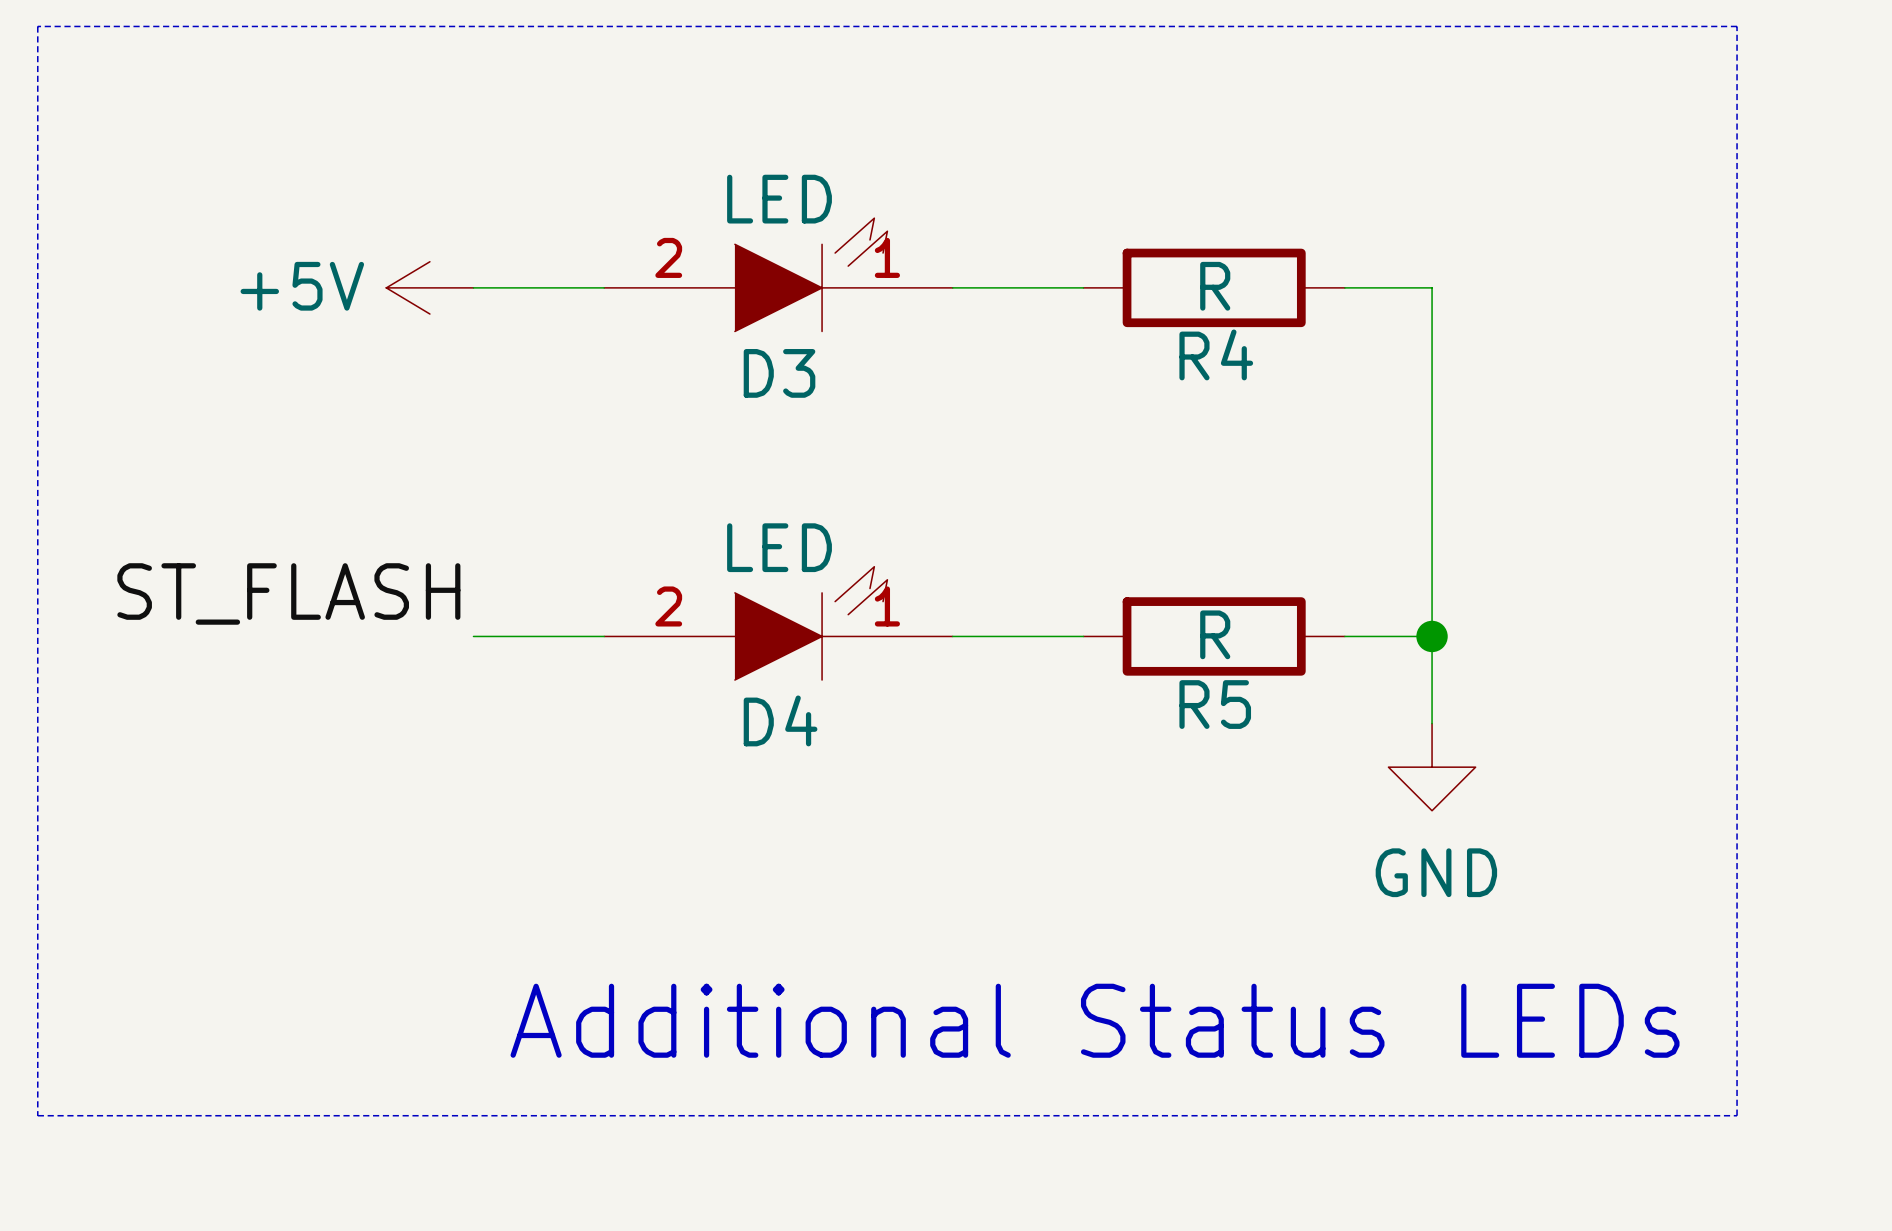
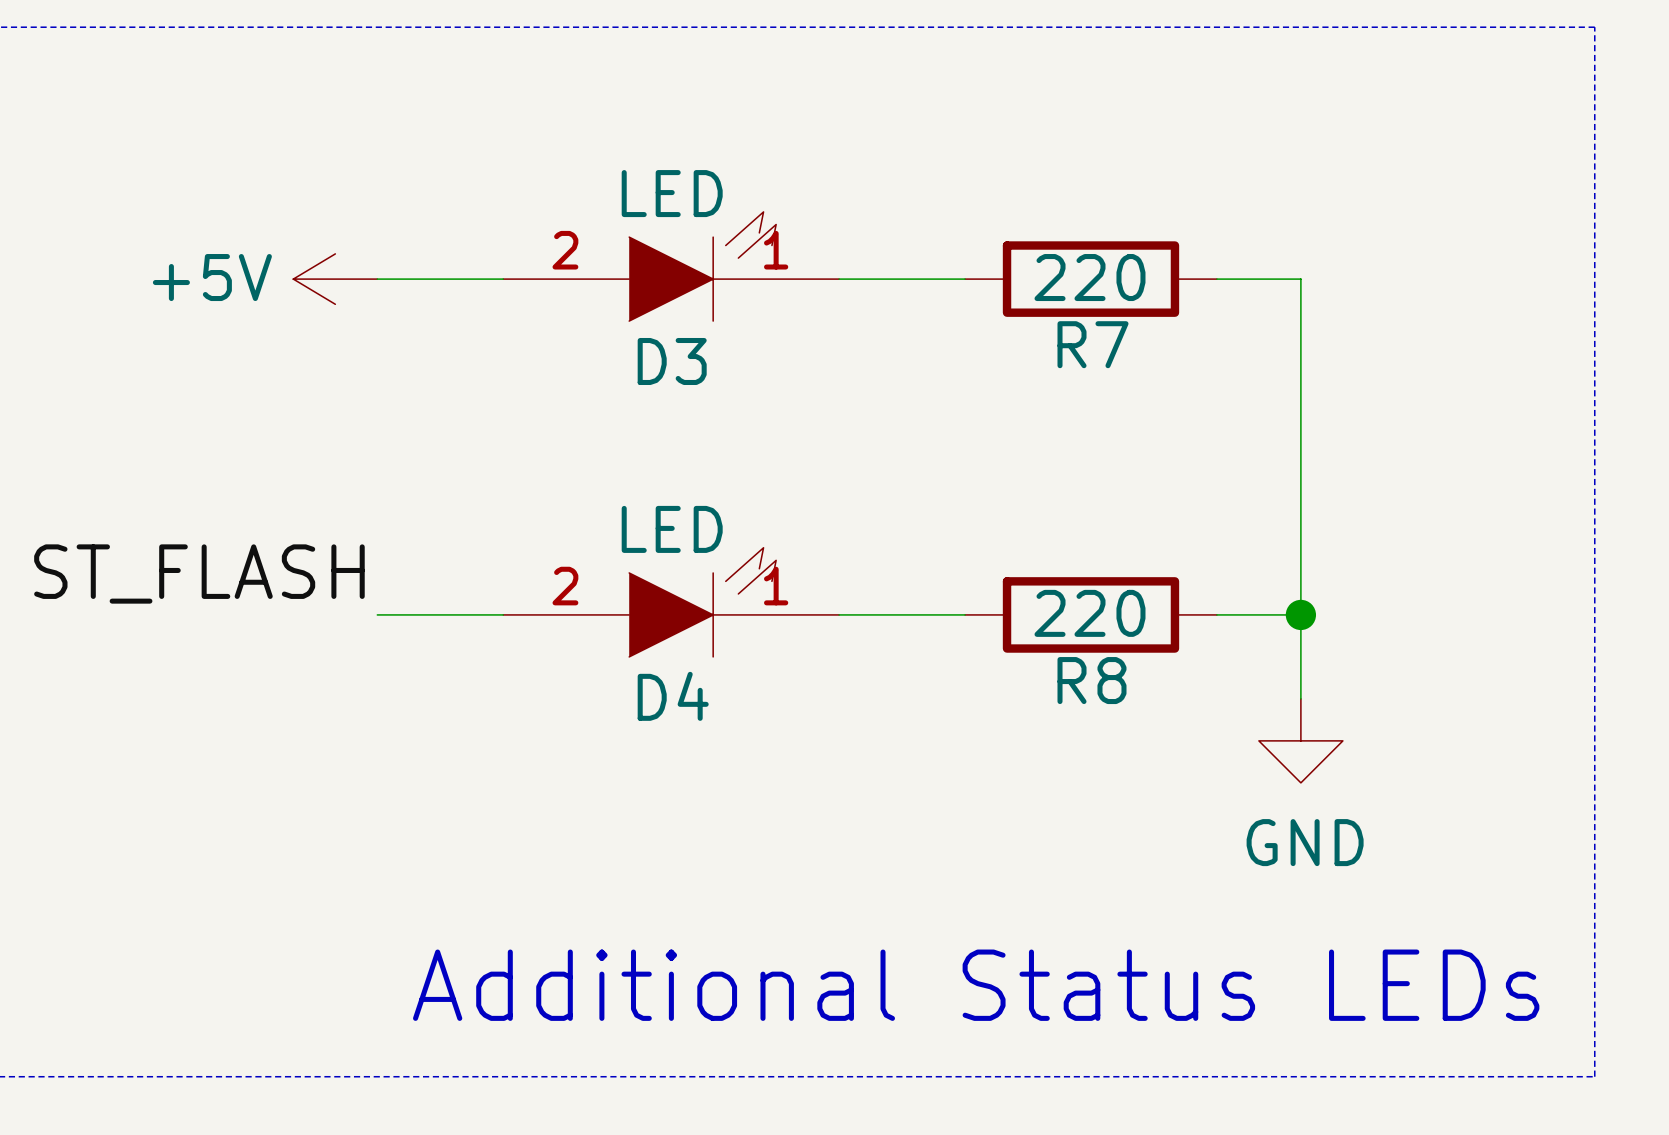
R4 value: R (1215, 286) -> 220 (1089, 277)
R4 name: R4 (1216, 354) -> R7 (1092, 344)
R5 value: R (1215, 634) -> 220 (1089, 613)
R5 name: R5 (1215, 704) -> R8 (1091, 680)

